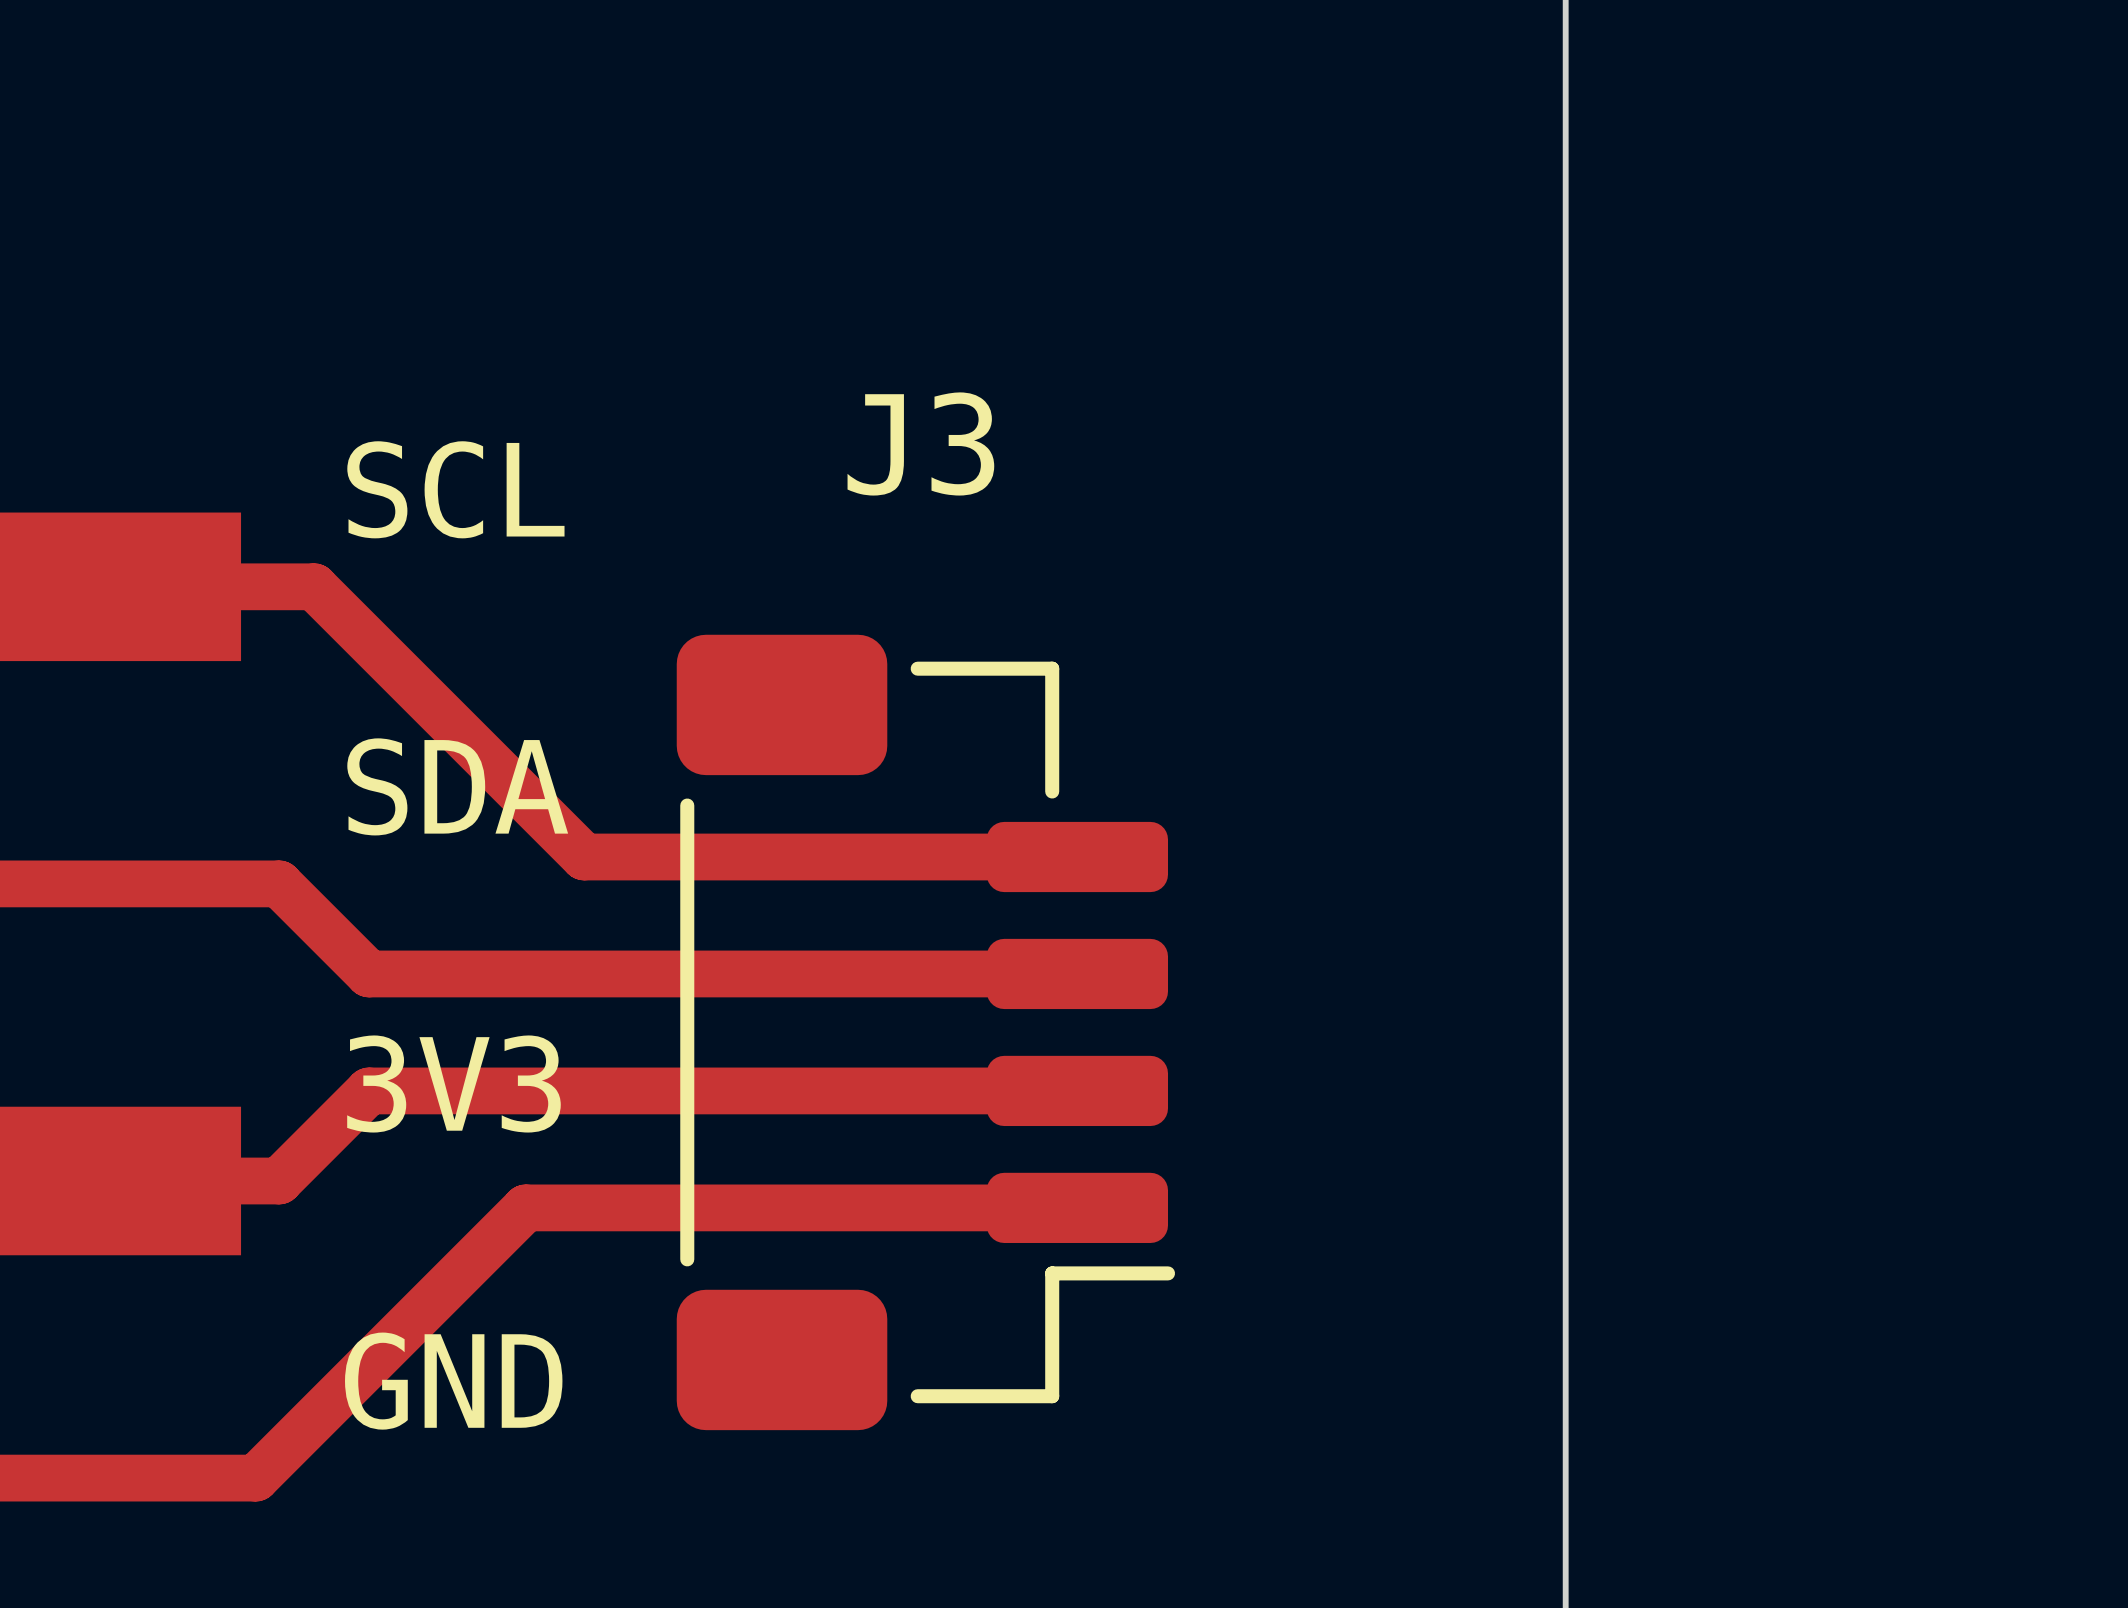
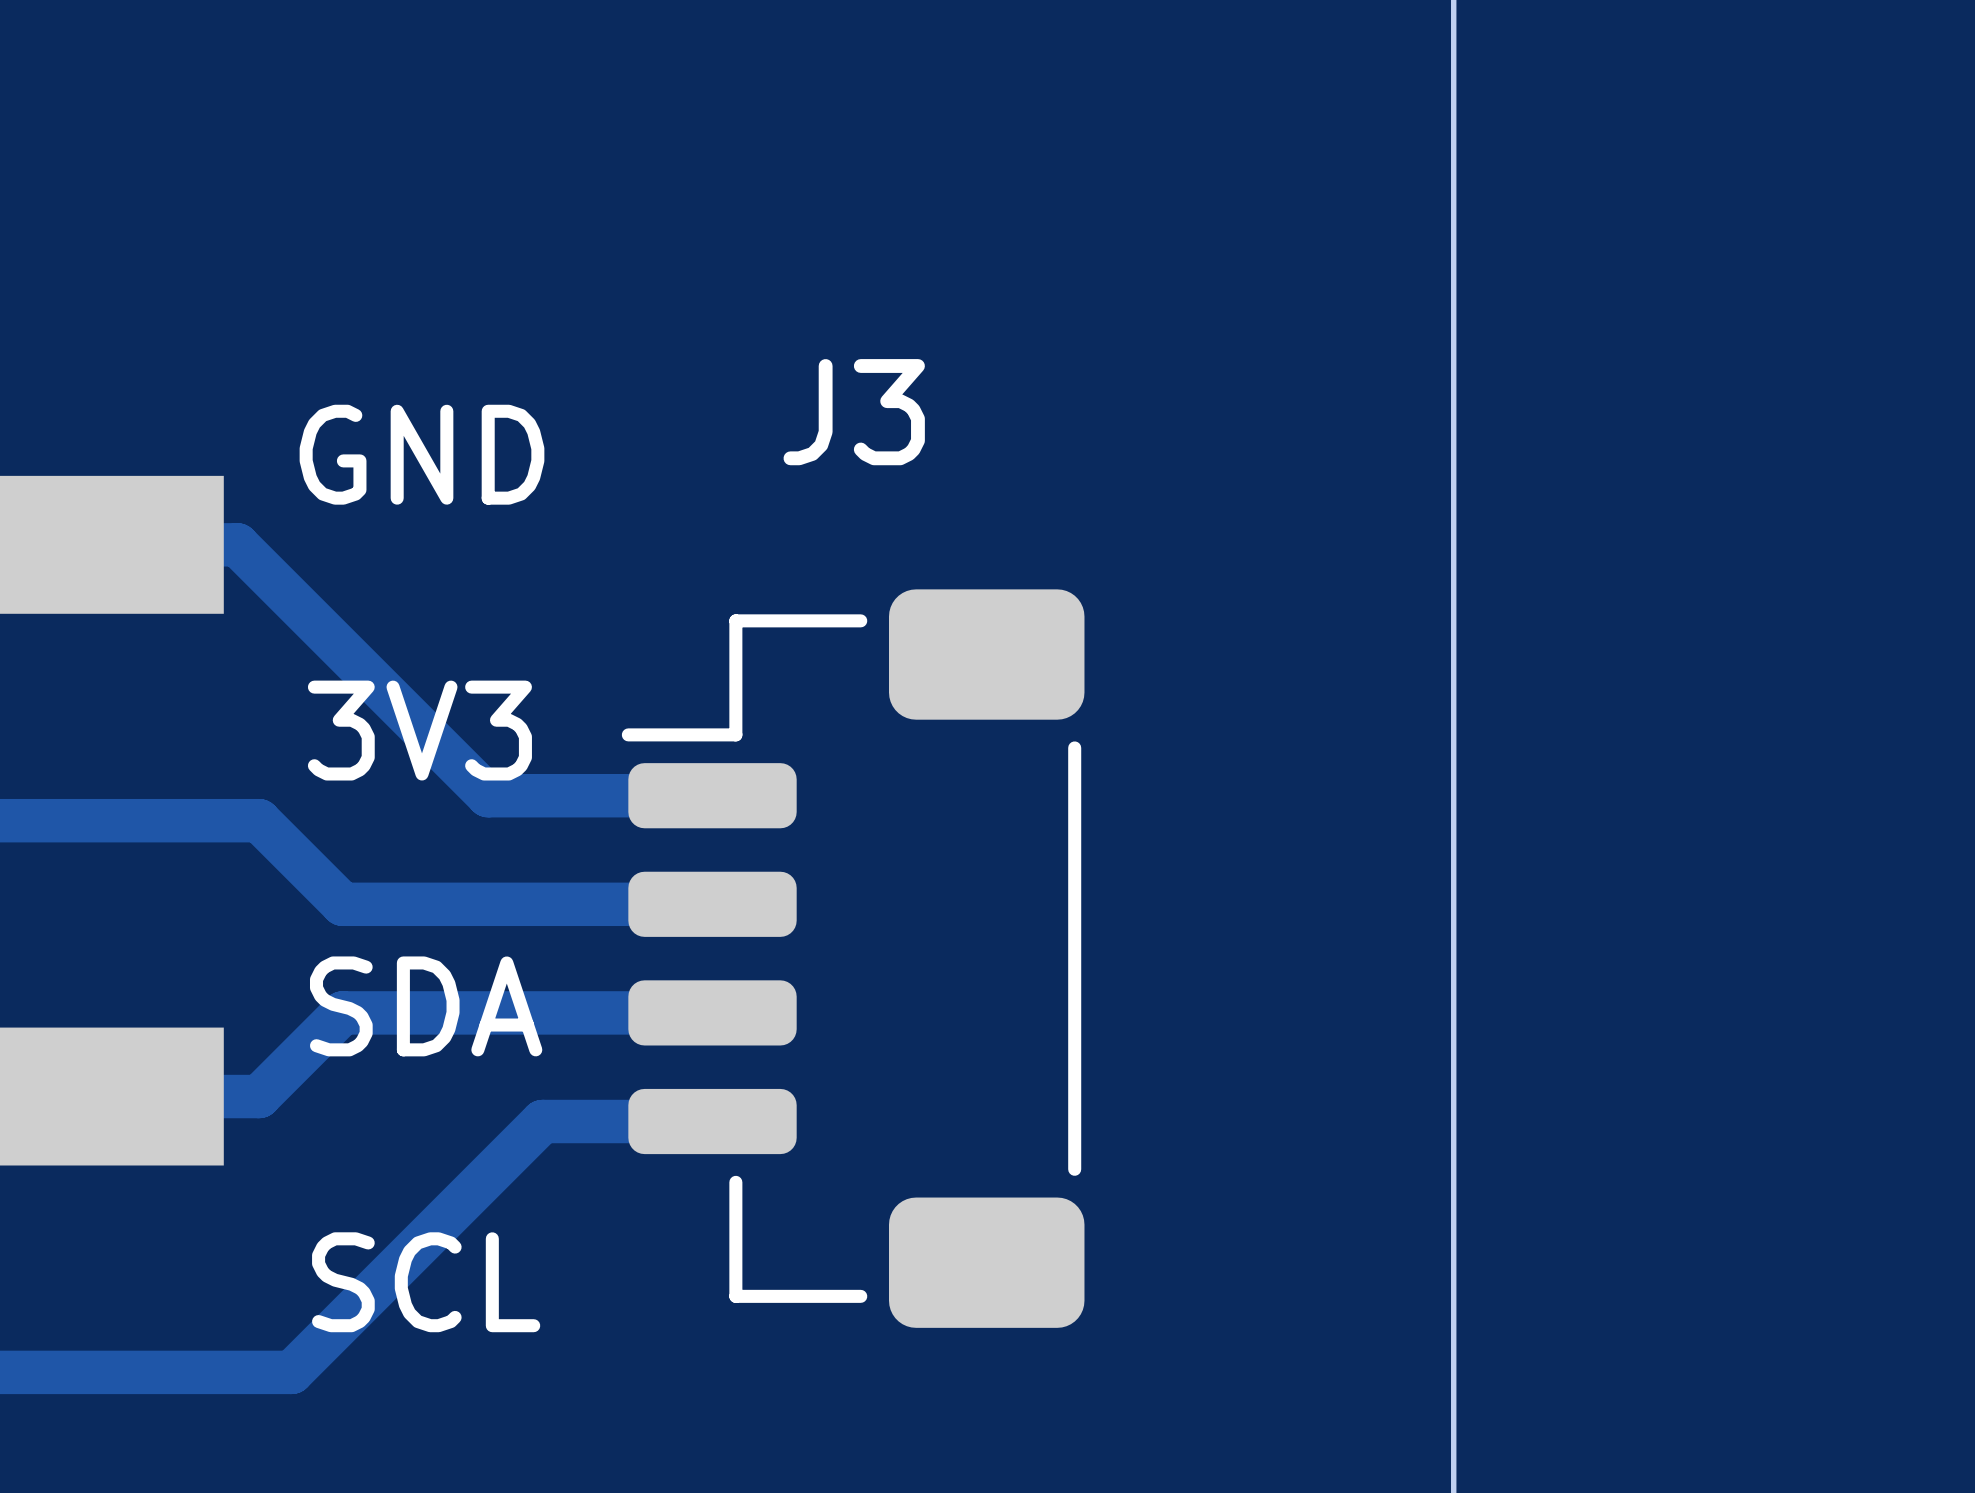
text: SCL (455, 489) -> GND (422, 454)
track: (255, 586) (314, 586) (584, 857) -> (237, 544) (488, 795) (542, 795)
text: SDA (457, 786) -> 3V3 (419, 730)
track: (767, 857) (1077, 857) -> none
track: (767, 973) (1077, 973) -> none
part rotation: 0° (925, 1032) -> 180° (853, 958)
text: 3V3 (453, 1083) -> SDA (426, 1006)
track: (767, 1090) (1077, 1090) -> none
track: (584, 1207) (525, 1207) (255, 1478) -> (542, 1121) (291, 1372) (237, 1372)
track: (767, 1207) (1077, 1207) -> none
text: GND (453, 1381) -> SCL (426, 1282)

